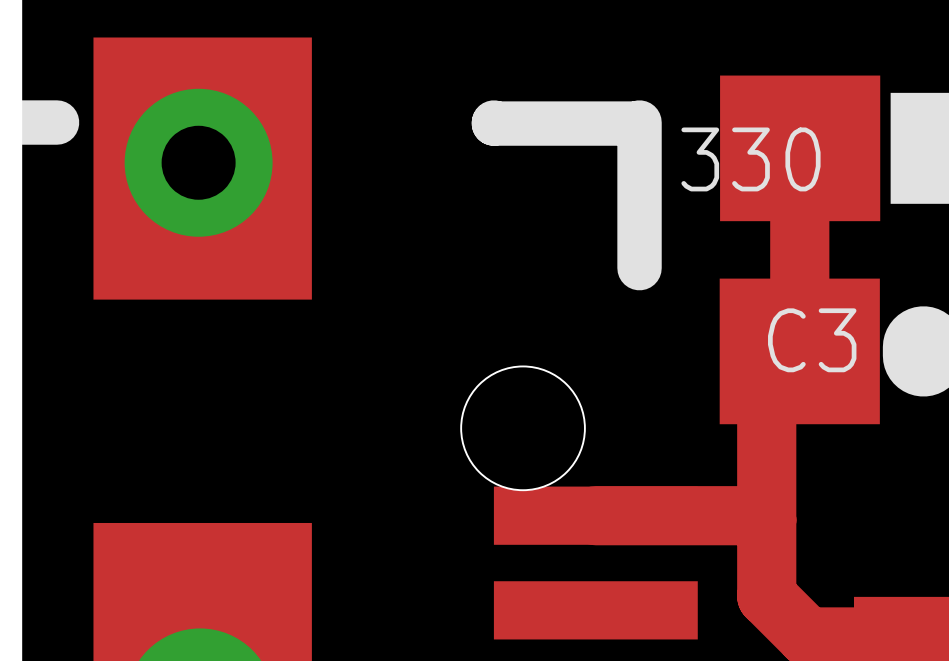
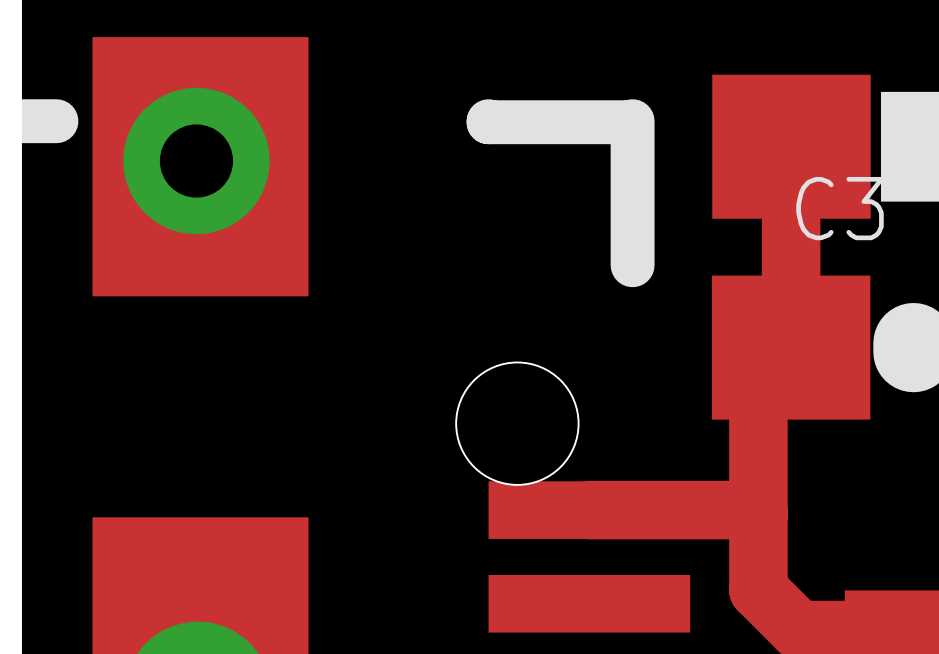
part value: 330 (750, 159) -> none
C3 name position: C3 (812, 340) -> C3 (840, 208)

